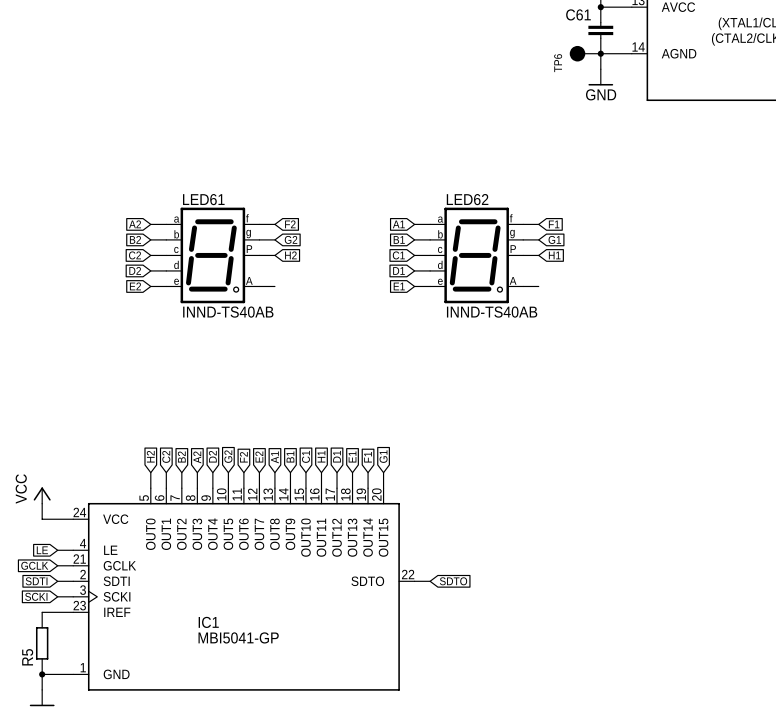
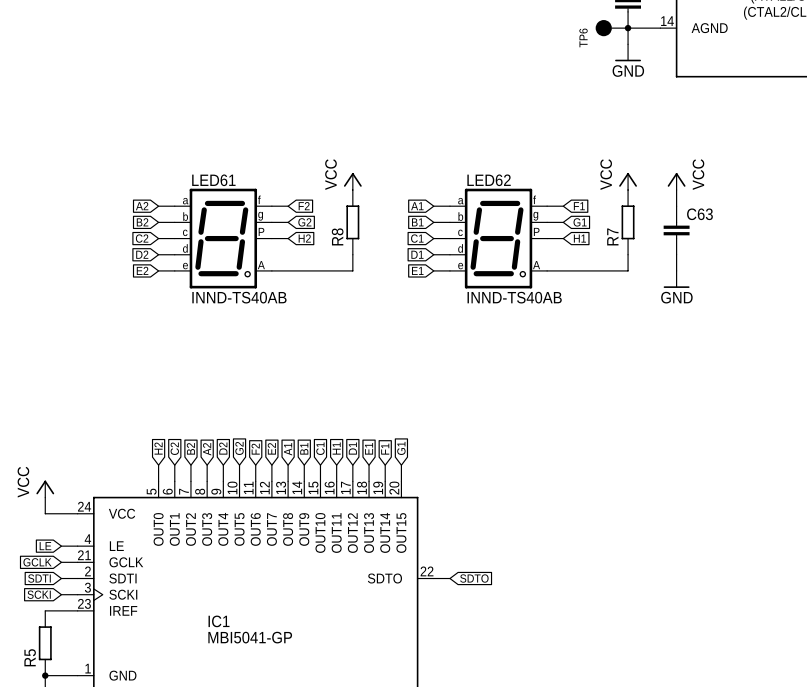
power symbol: none -> VCC (352, 181)
power symbol: none -> VCC (628, 181)
power symbol: none -> VCC (676, 181)
wire: none -> (676, 190) (676, 206)
R8: none -> (352, 222)
R7: none -> (628, 222)
C63: none -> (676, 230)
wire: none -> (352, 254) (352, 270) (288, 270)
wire: none -> (628, 254) (628, 270) (563, 270)
wire: none -> (676, 254) (676, 270)
power symbol: none -> GND (676, 279)

